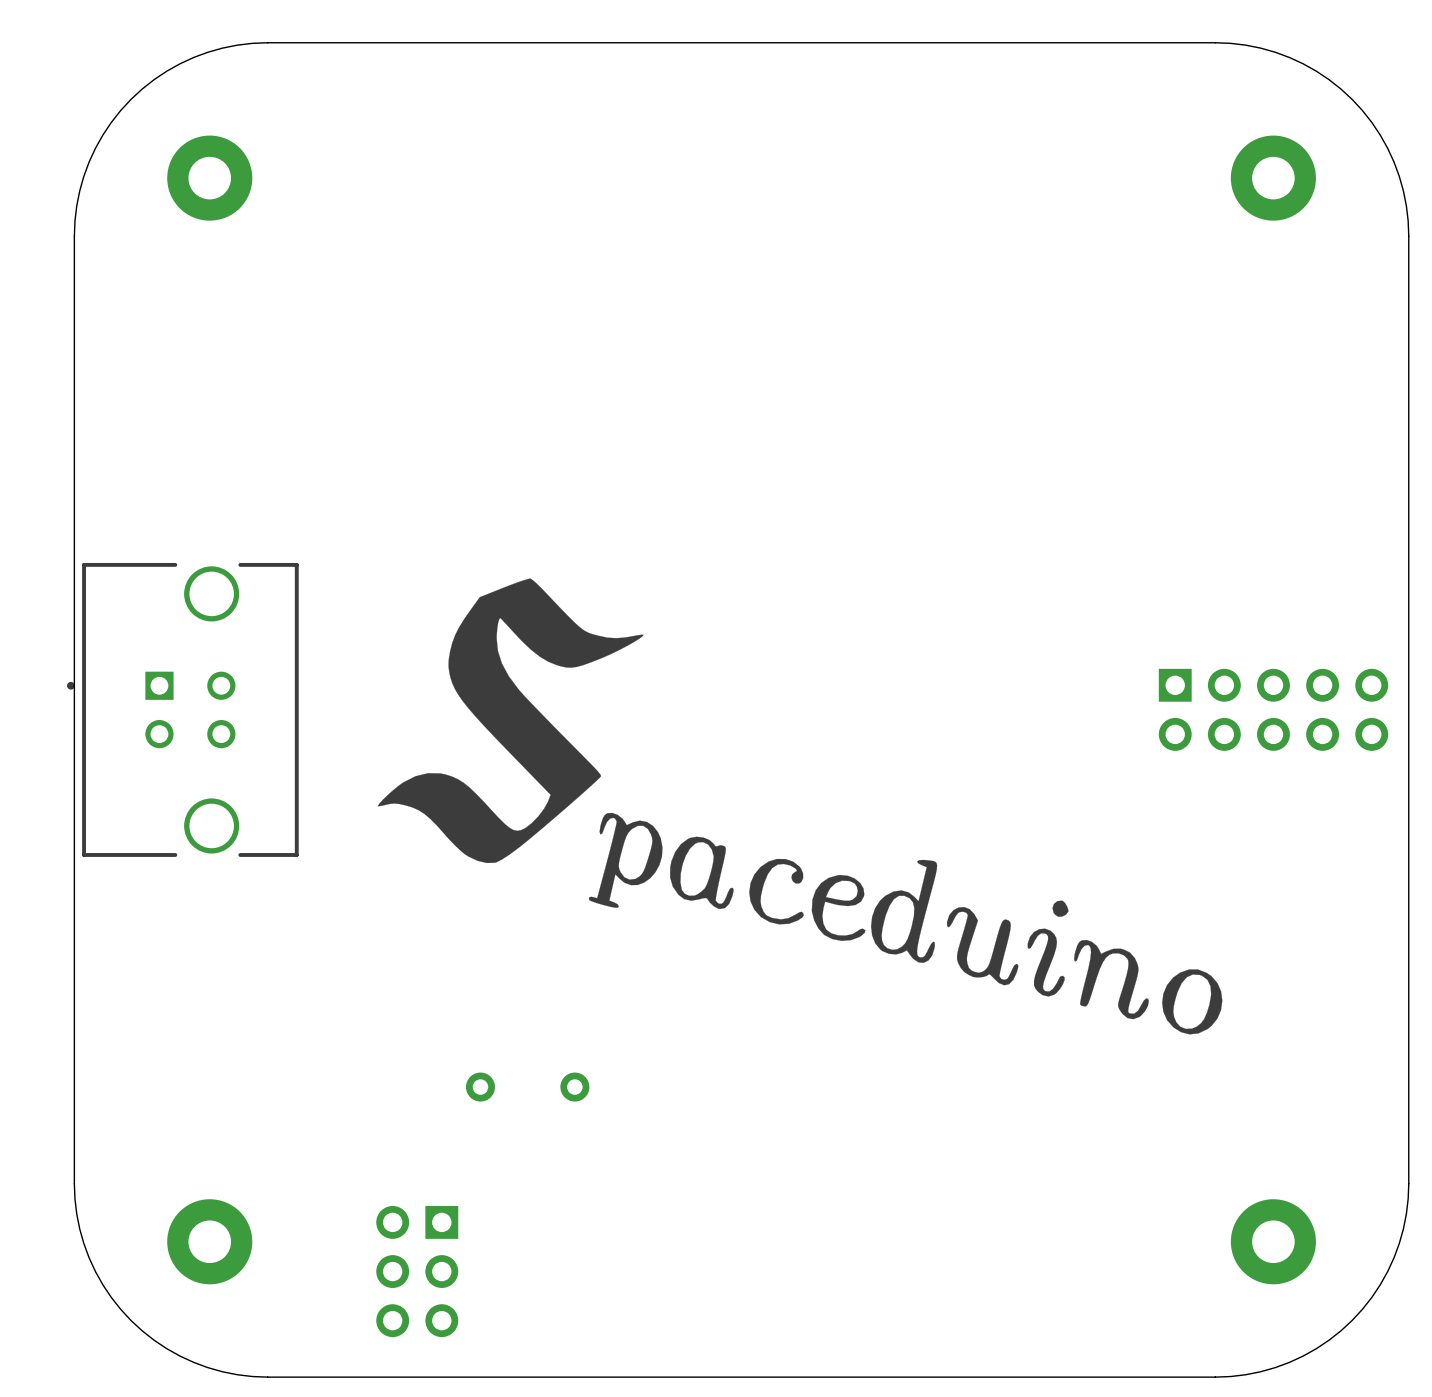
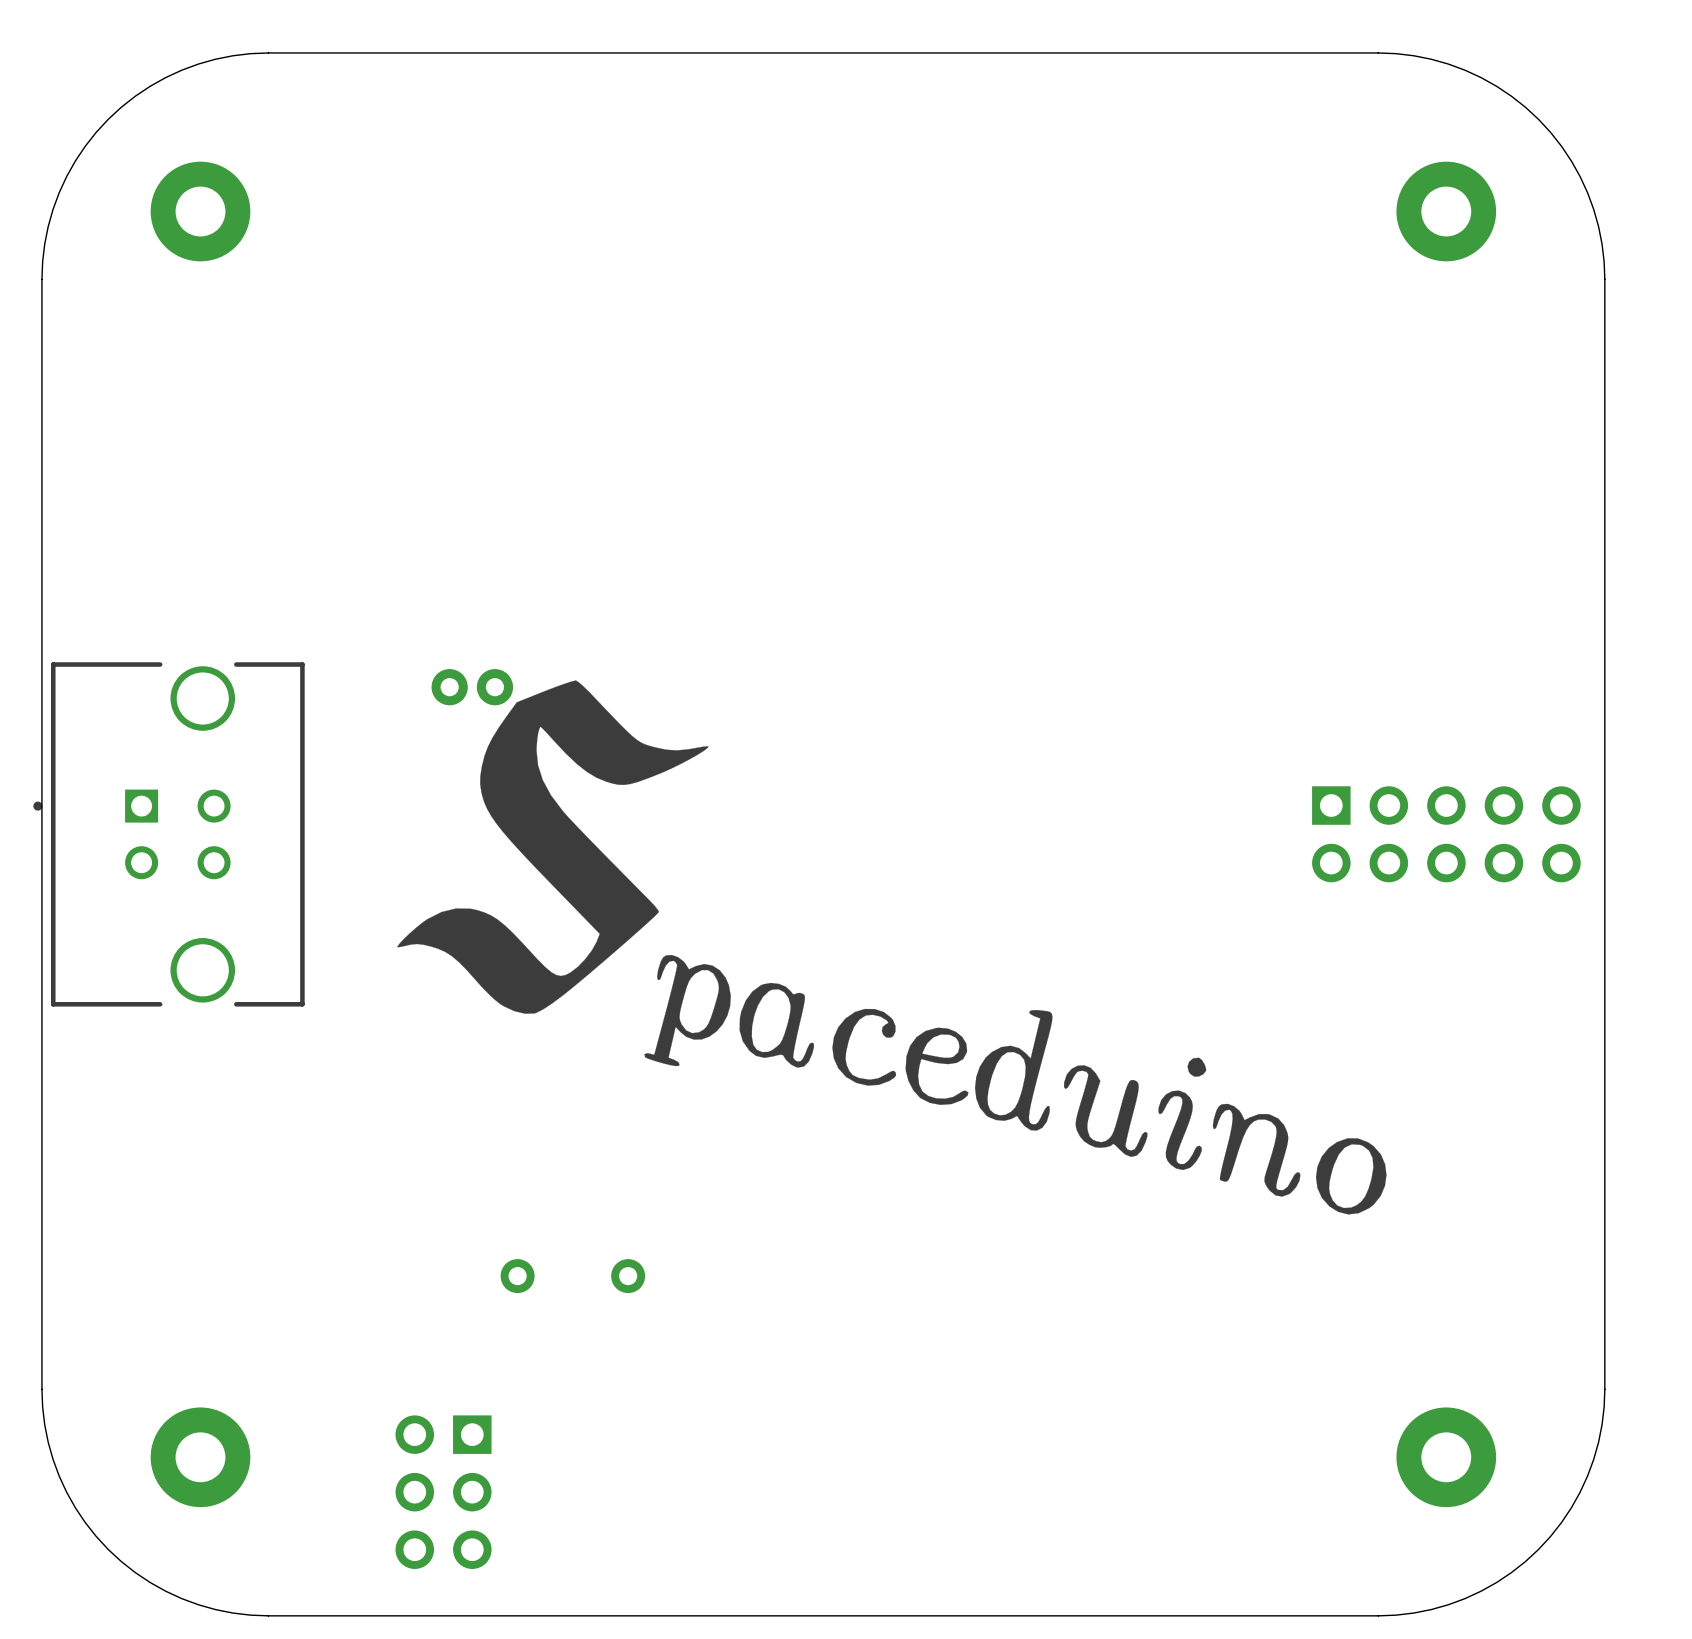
part: none -> (472, 687)

